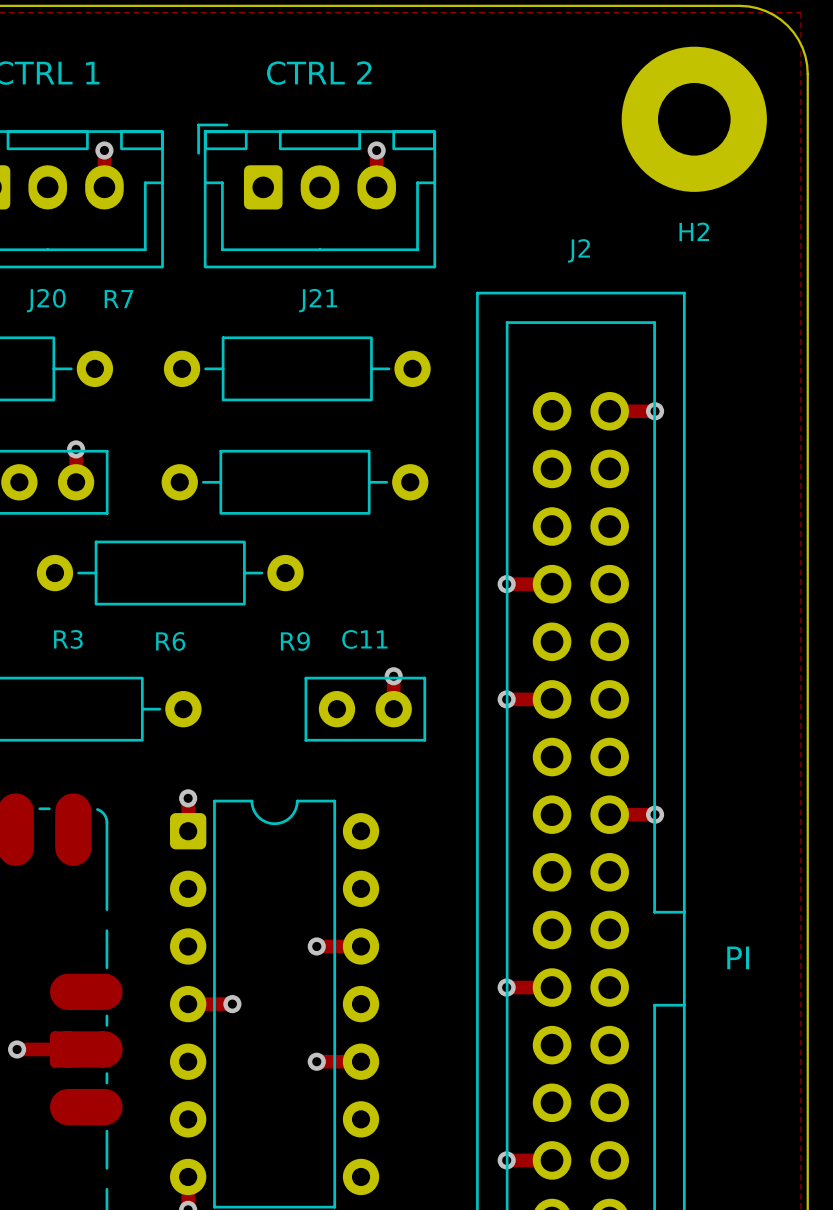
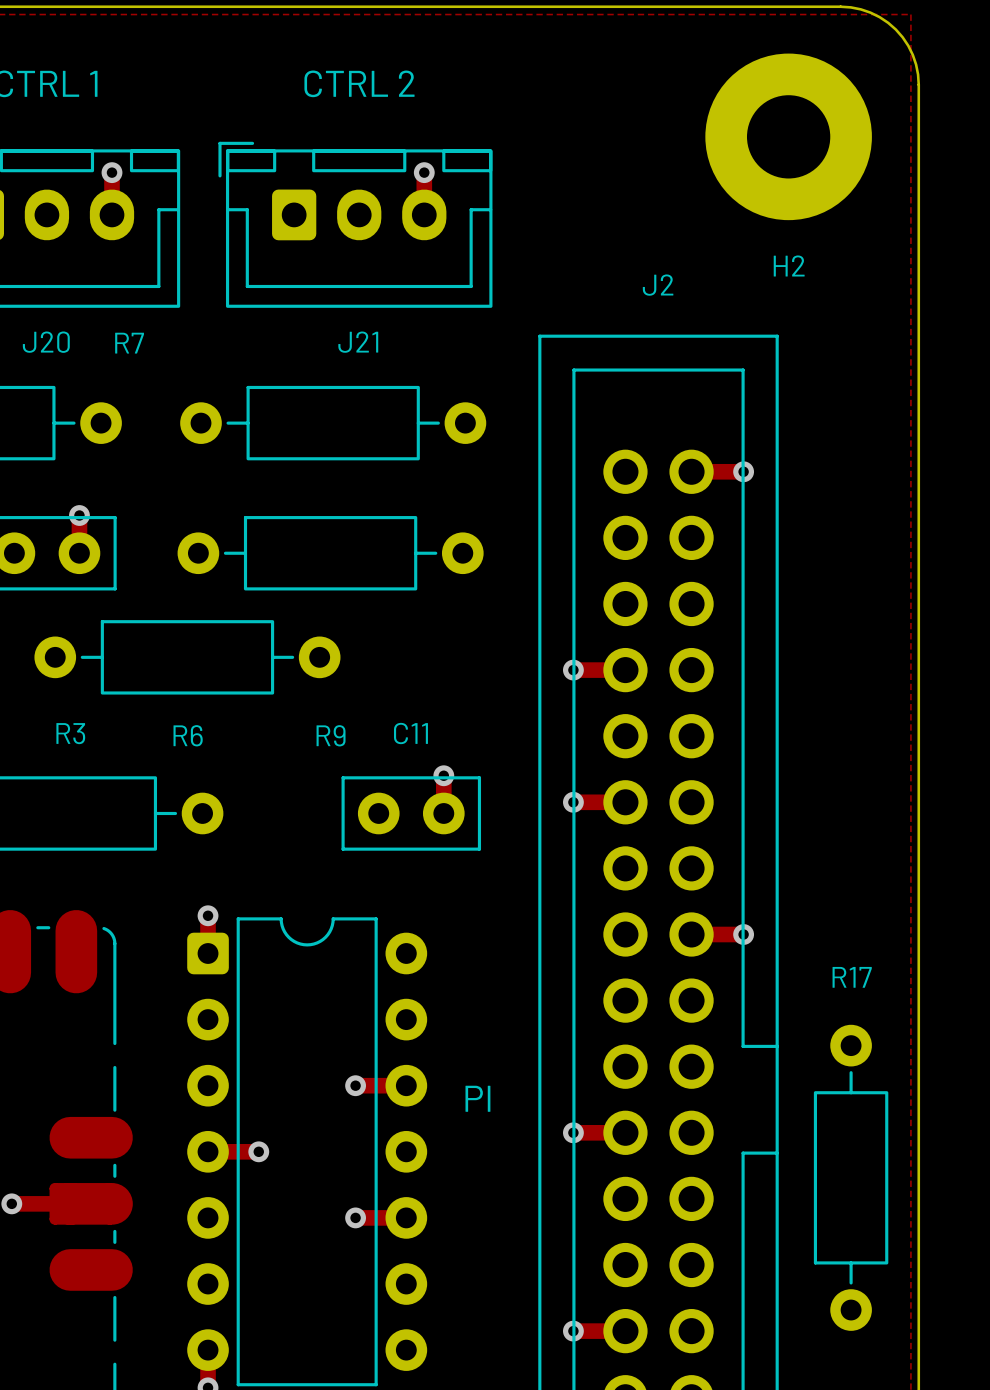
text position: PI (738, 957) -> PI (477, 1098)
R17: none -> (851, 1177)

